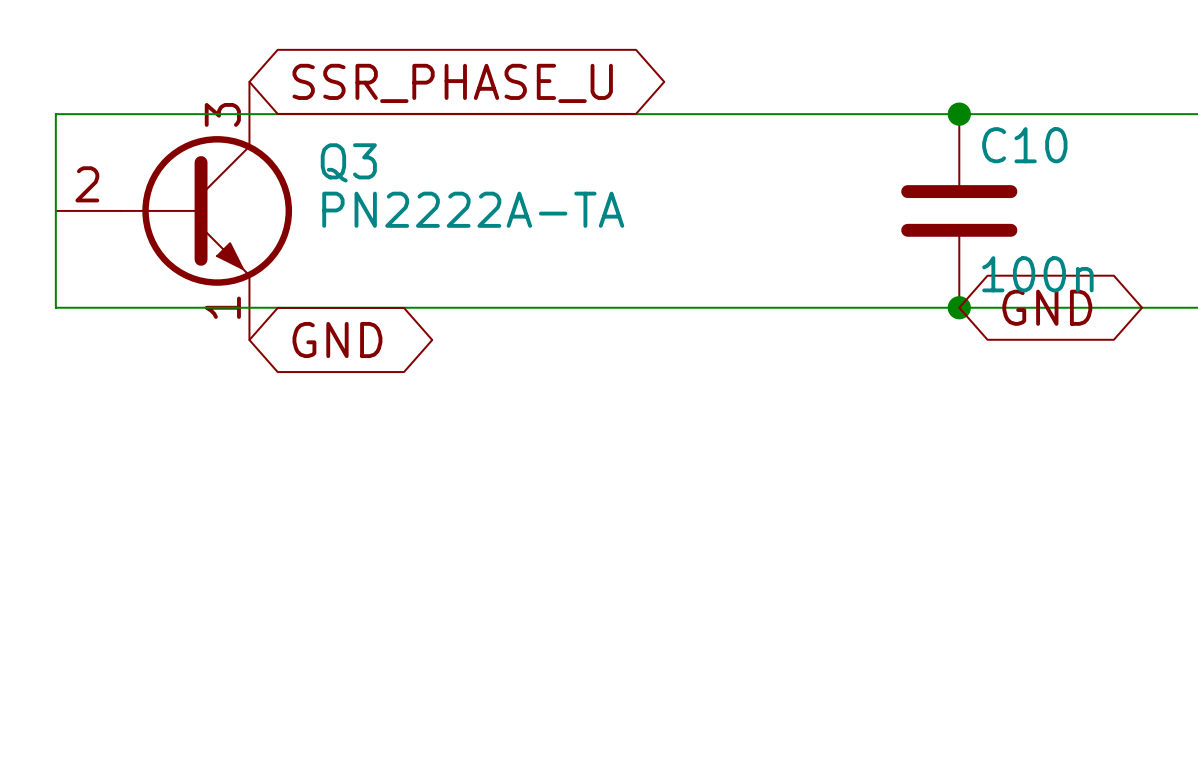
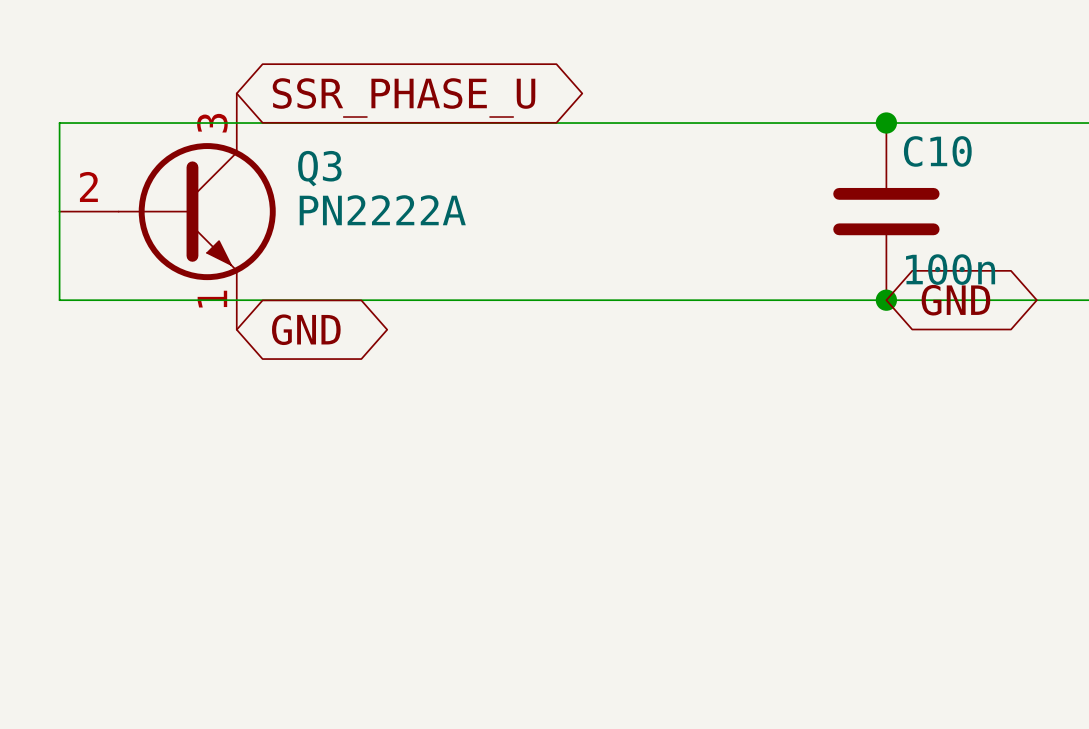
Q3 value: PN2222A-TA (473, 209) -> PN2222A (382, 210)

